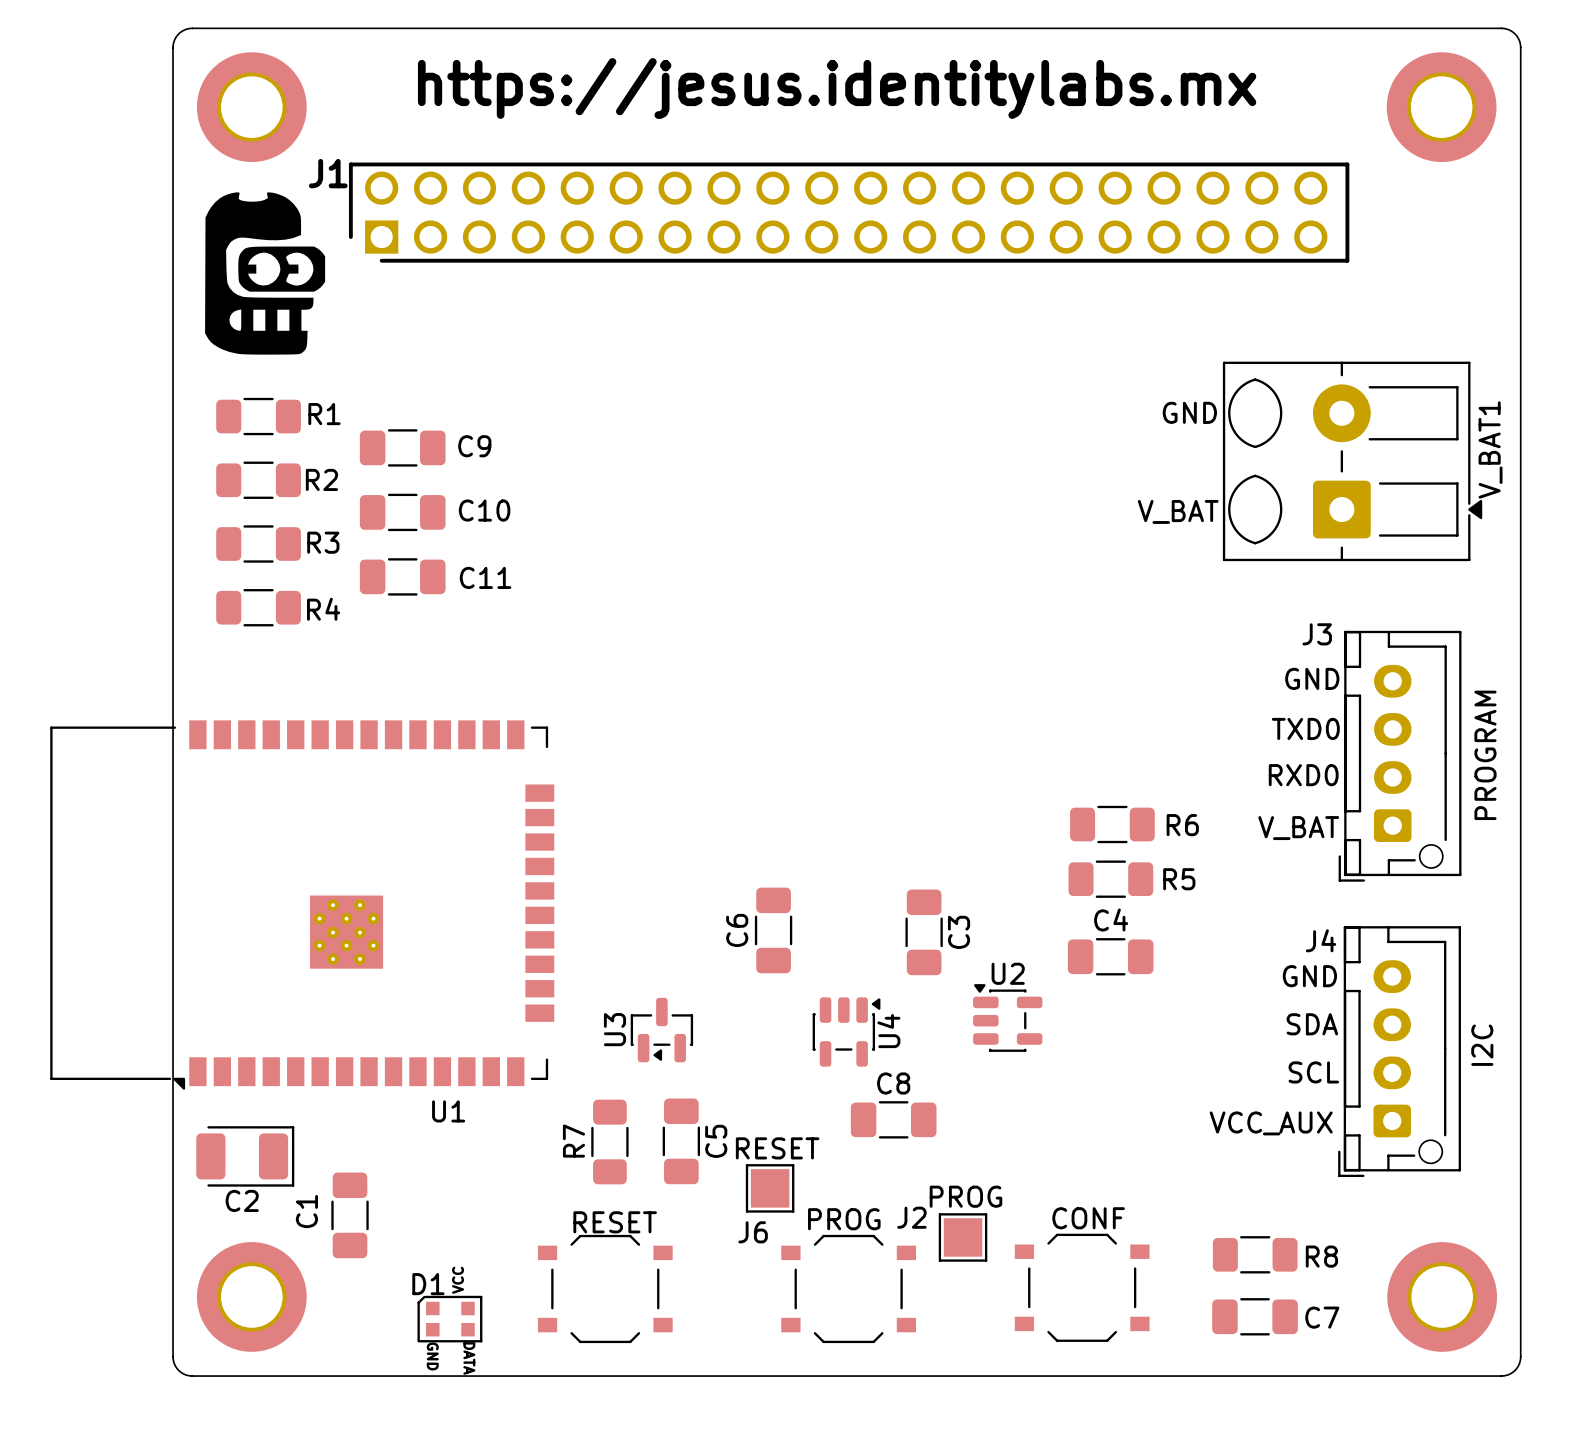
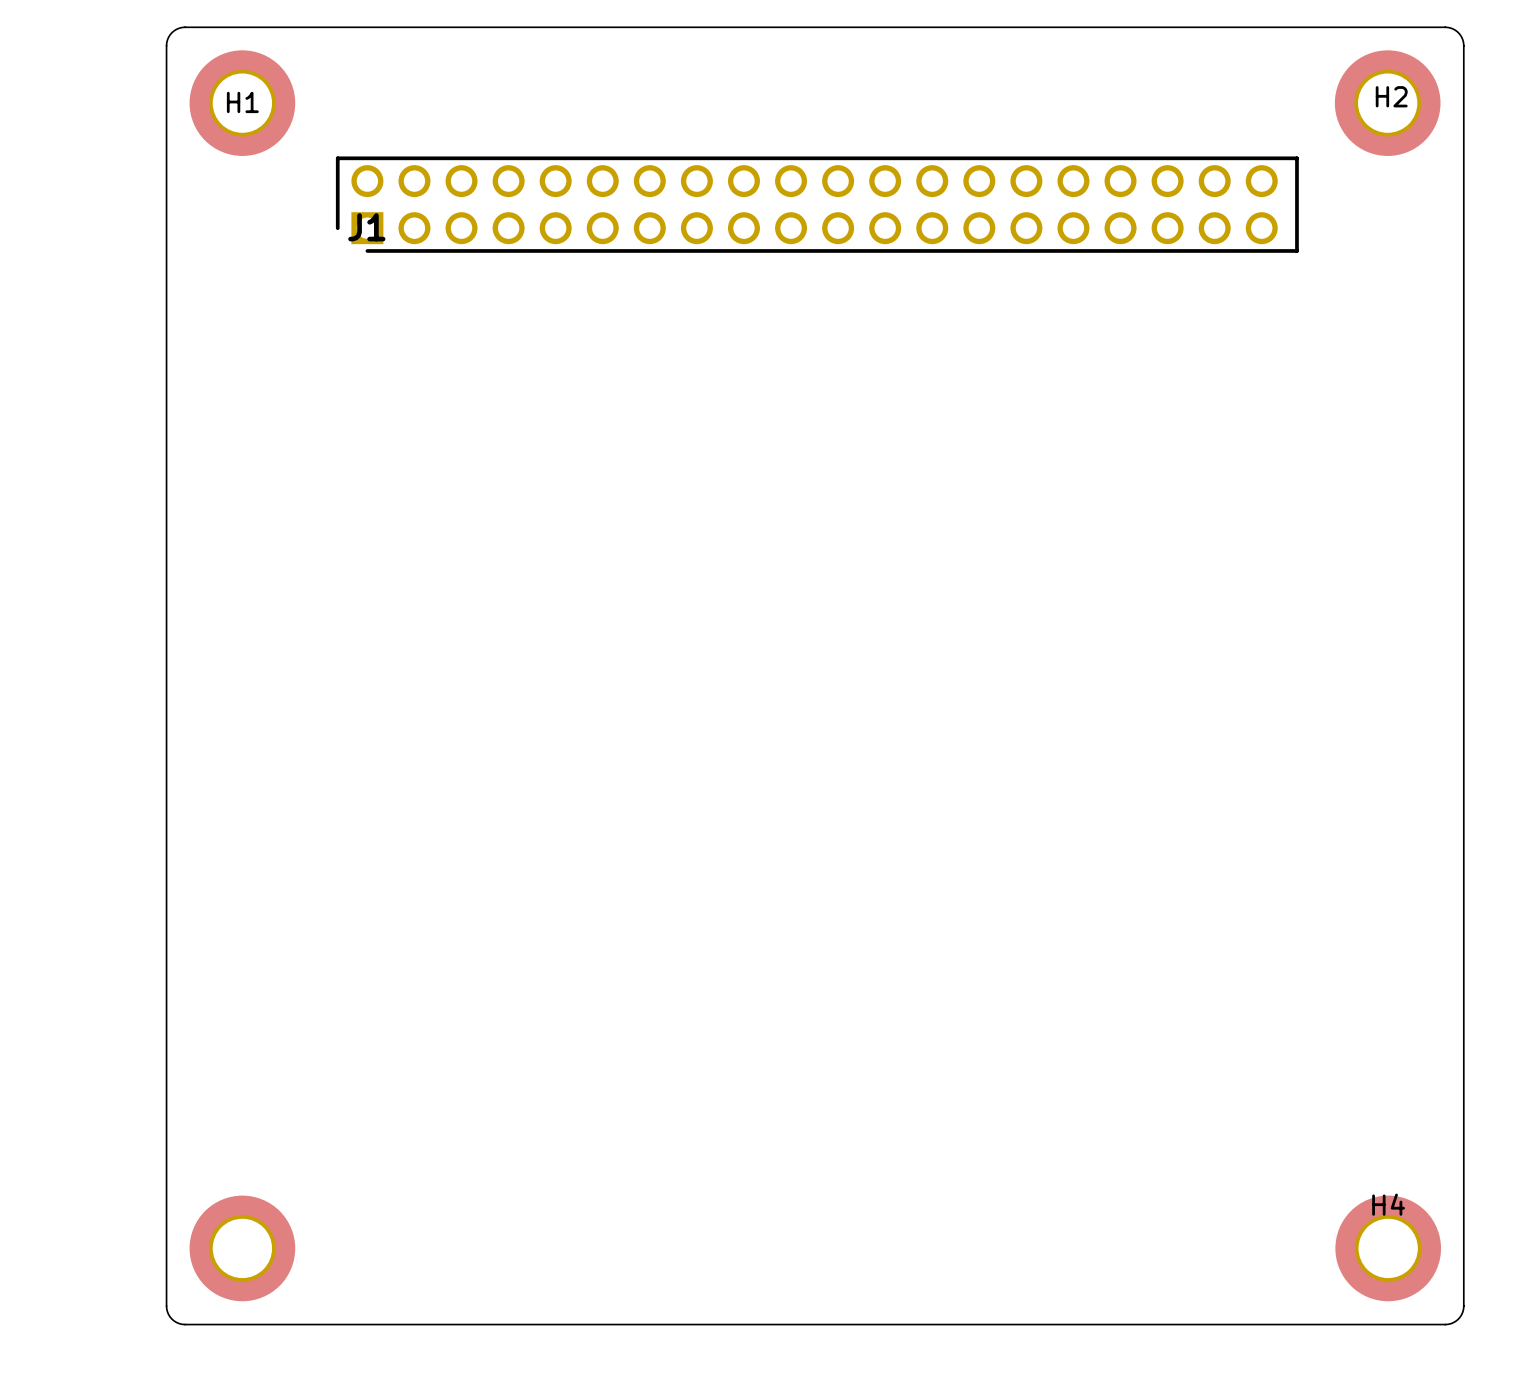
text: https://jesus.identitylabs.mx (837, 88) -> none
H2 name: none -> H2 (1391, 96)
H1 name: none -> H1 (242, 102)
J1 name position: J1 (328, 173) -> J1 (366, 227)
drawing: [205, 192, 326, 355] -> none
text: GND (1189, 412) -> none
R1: (258, 416) -> none
C9: (402, 447) -> none
V_BAT1: (1352, 461) -> none
R2: (258, 480) -> none
text: V_BAT (1178, 511) -> none
C10: (402, 512) -> none
R3: (258, 543) -> none
C11: (402, 576) -> none
R4: (258, 607) -> none
text: GND (1312, 678) -> none
text: TXD0 (1305, 728) -> none
text: PROGRAM (1485, 755) -> none
J3: (1400, 756) -> none
text: RXD0 (1303, 775) -> none
R6: (1112, 824) -> none
text: V_BAT (1298, 828) -> none
R5: (1110, 879) -> none
U1: (302, 905) -> none
C6: (773, 930) -> none
C3: (924, 932) -> none
C4: (1110, 956) -> none
text: GND (1309, 976) -> none
U2: (1007, 1017) -> none
text: SDA (1312, 1024) -> none
U3: (661, 1030) -> none
U4: (846, 1032) -> none
text: I2C (1482, 1045) -> none
J4: (1399, 1051) -> none
text: SCL (1313, 1072) -> none
C8: (893, 1119) -> none
text: VCC_AUX (1271, 1123) -> none
R7: (609, 1141) -> none
C5: (681, 1141) -> none
text: RESET (777, 1148) -> none
C2: (245, 1156) -> none
J6: (770, 1188) -> none
text: PROG (965, 1196) -> none
C1: (350, 1215) -> none
text: CONF (1088, 1218) -> none
text: PROG (844, 1219) -> none
text: RESET (615, 1222) -> none
J2: (963, 1237) -> none
H4 name: none -> H4 (1388, 1204)
R8: (1255, 1254) -> none
text: VCC (458, 1280) -> none
part: (1082, 1287) -> none
part: (605, 1288) -> none
part: (848, 1288) -> none
C7: (1255, 1316) -> none
D1: (449, 1319) -> none
text: GND (432, 1356) -> none
text: DATA (469, 1358) -> none

